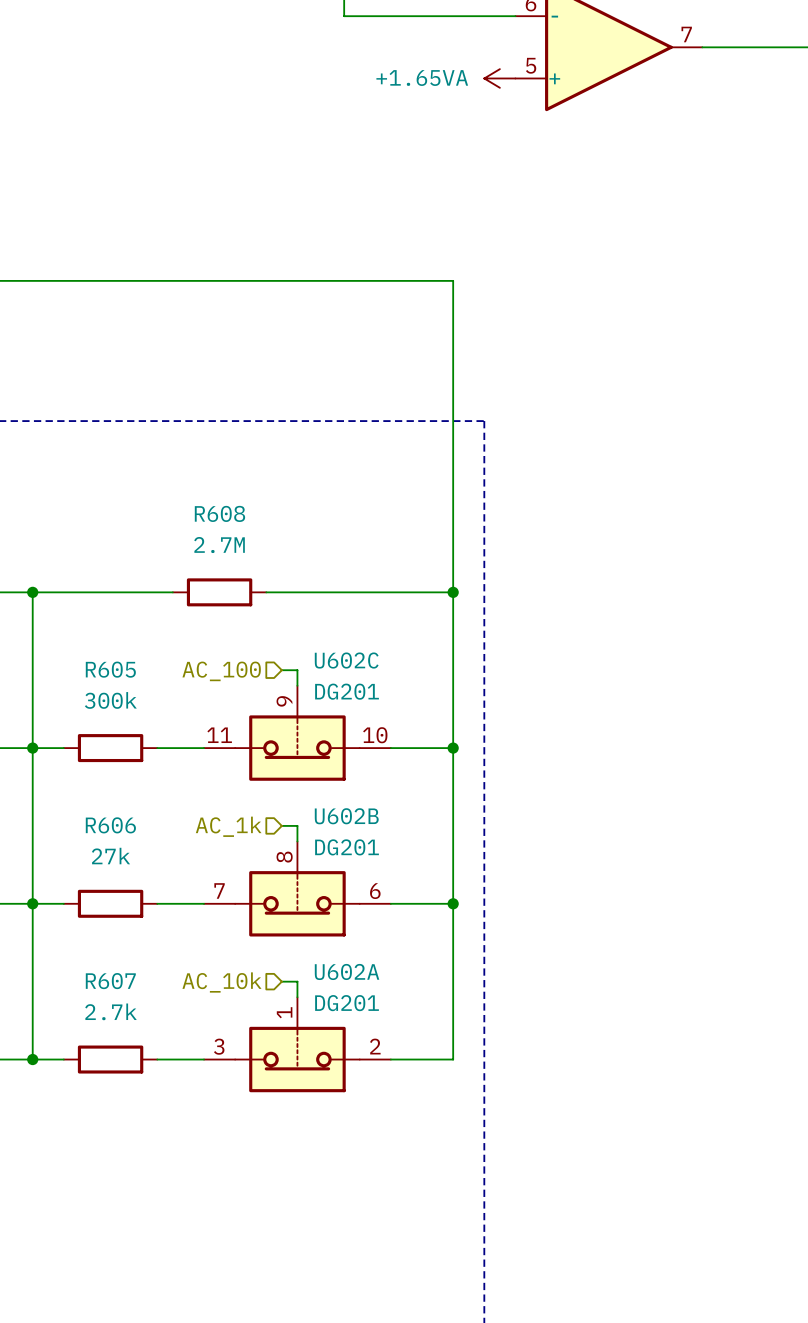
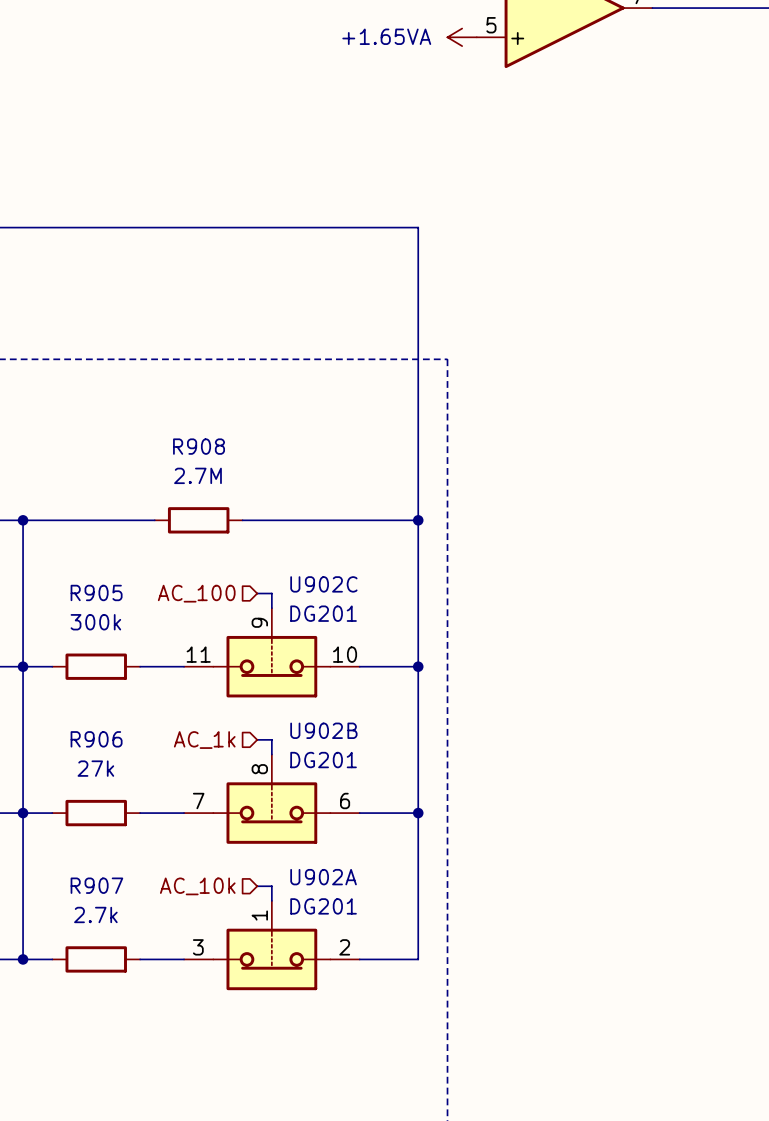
R608 name: R608 (219, 513) -> R908 (199, 446)
U602C name: U602C (346, 660) -> U902C (323, 584)
R605 name: R605 (110, 669) -> R905 (96, 592)
U602B name: U602B (346, 816) -> U902B (323, 730)
R606 name: R606 (110, 825) -> R906 (96, 739)
U602A name: U602A (347, 971) -> U902A (323, 877)
R607 name: R607 (110, 981) -> R907 (96, 885)

